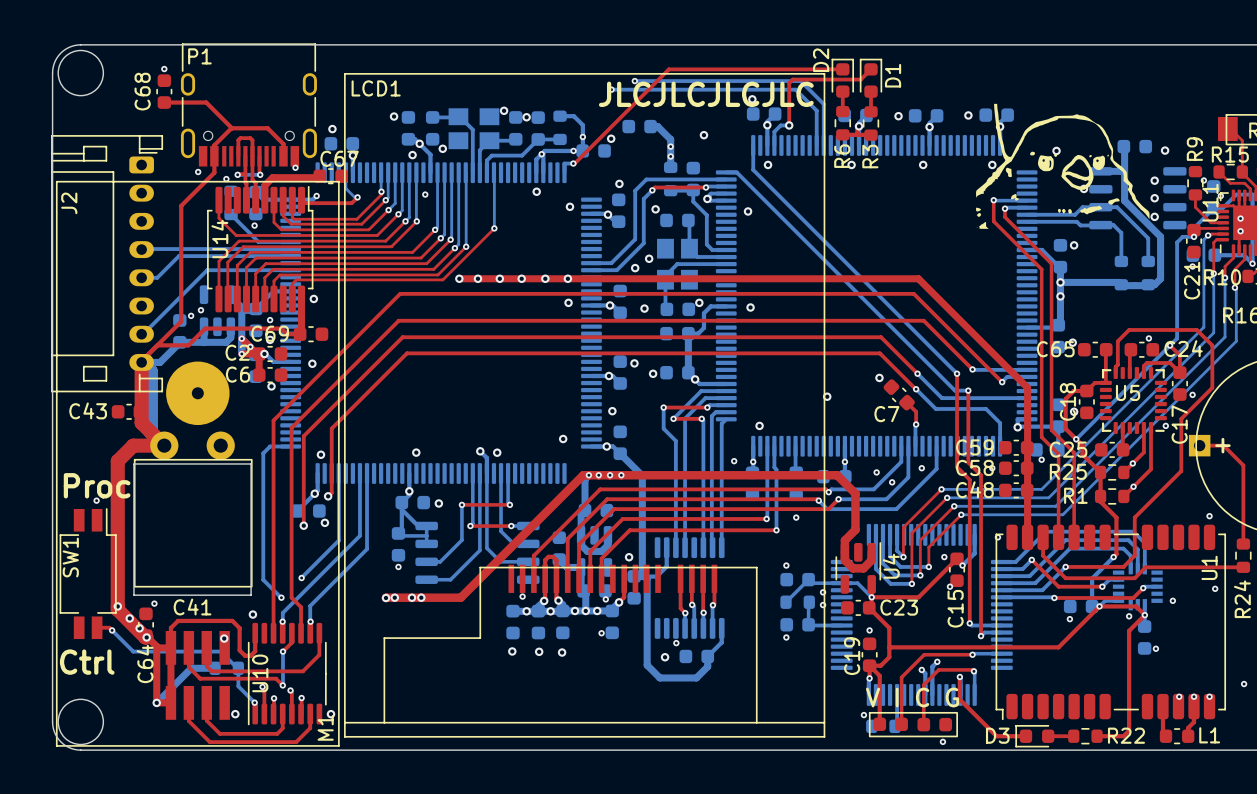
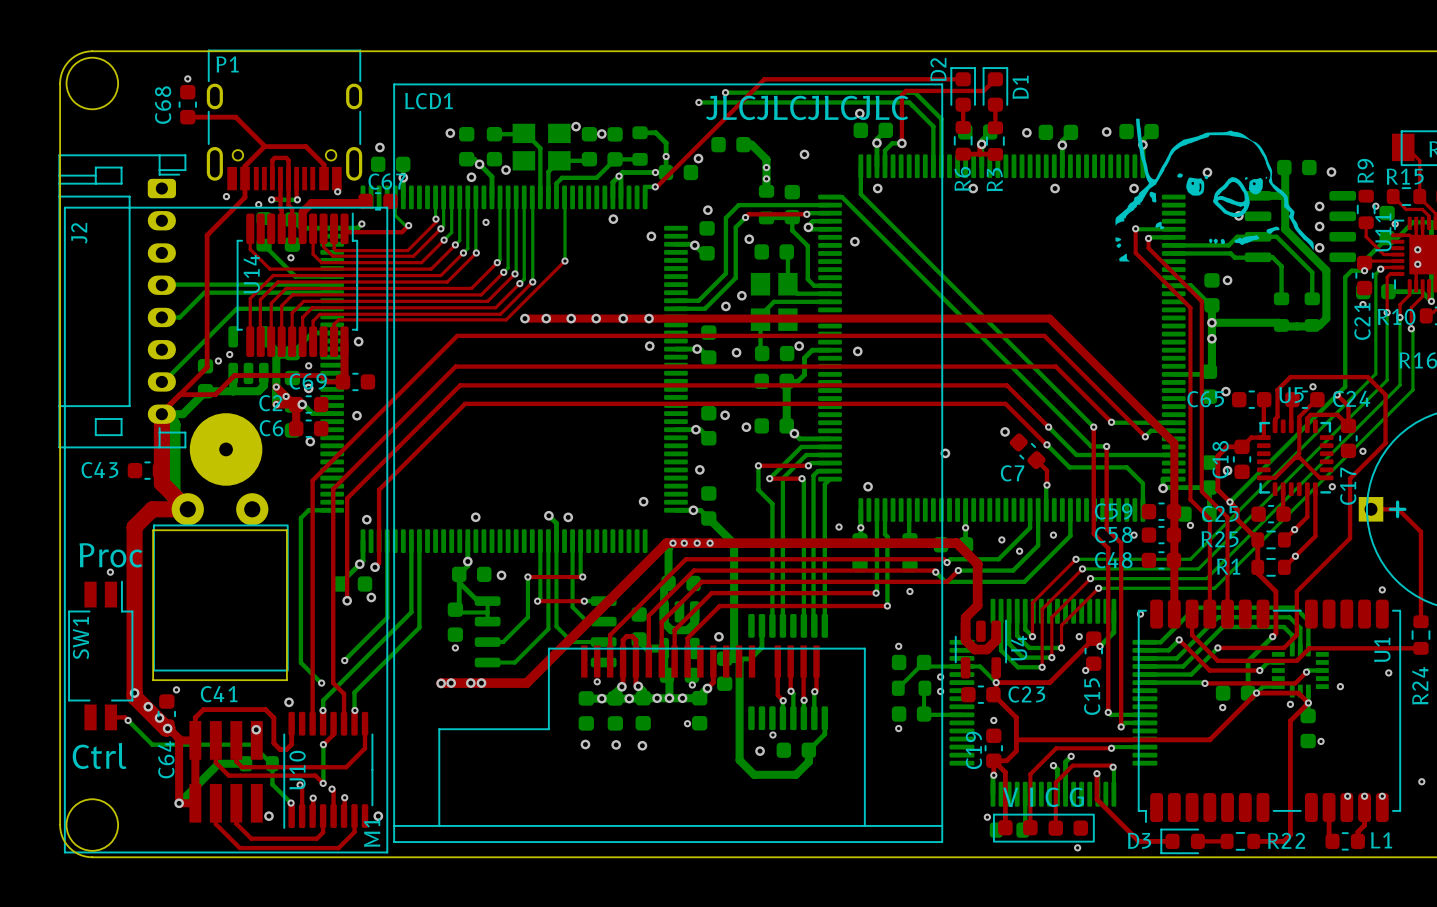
top track: none -> (1317, 399) (1299, 416) (1299, 453) (1275, 477) (1263, 477)
U5 name position: U5 (1128, 392) -> U5 (1291, 395)
top track: none -> (1295, 457) (1299, 457) (1319, 477) (1326, 477)

